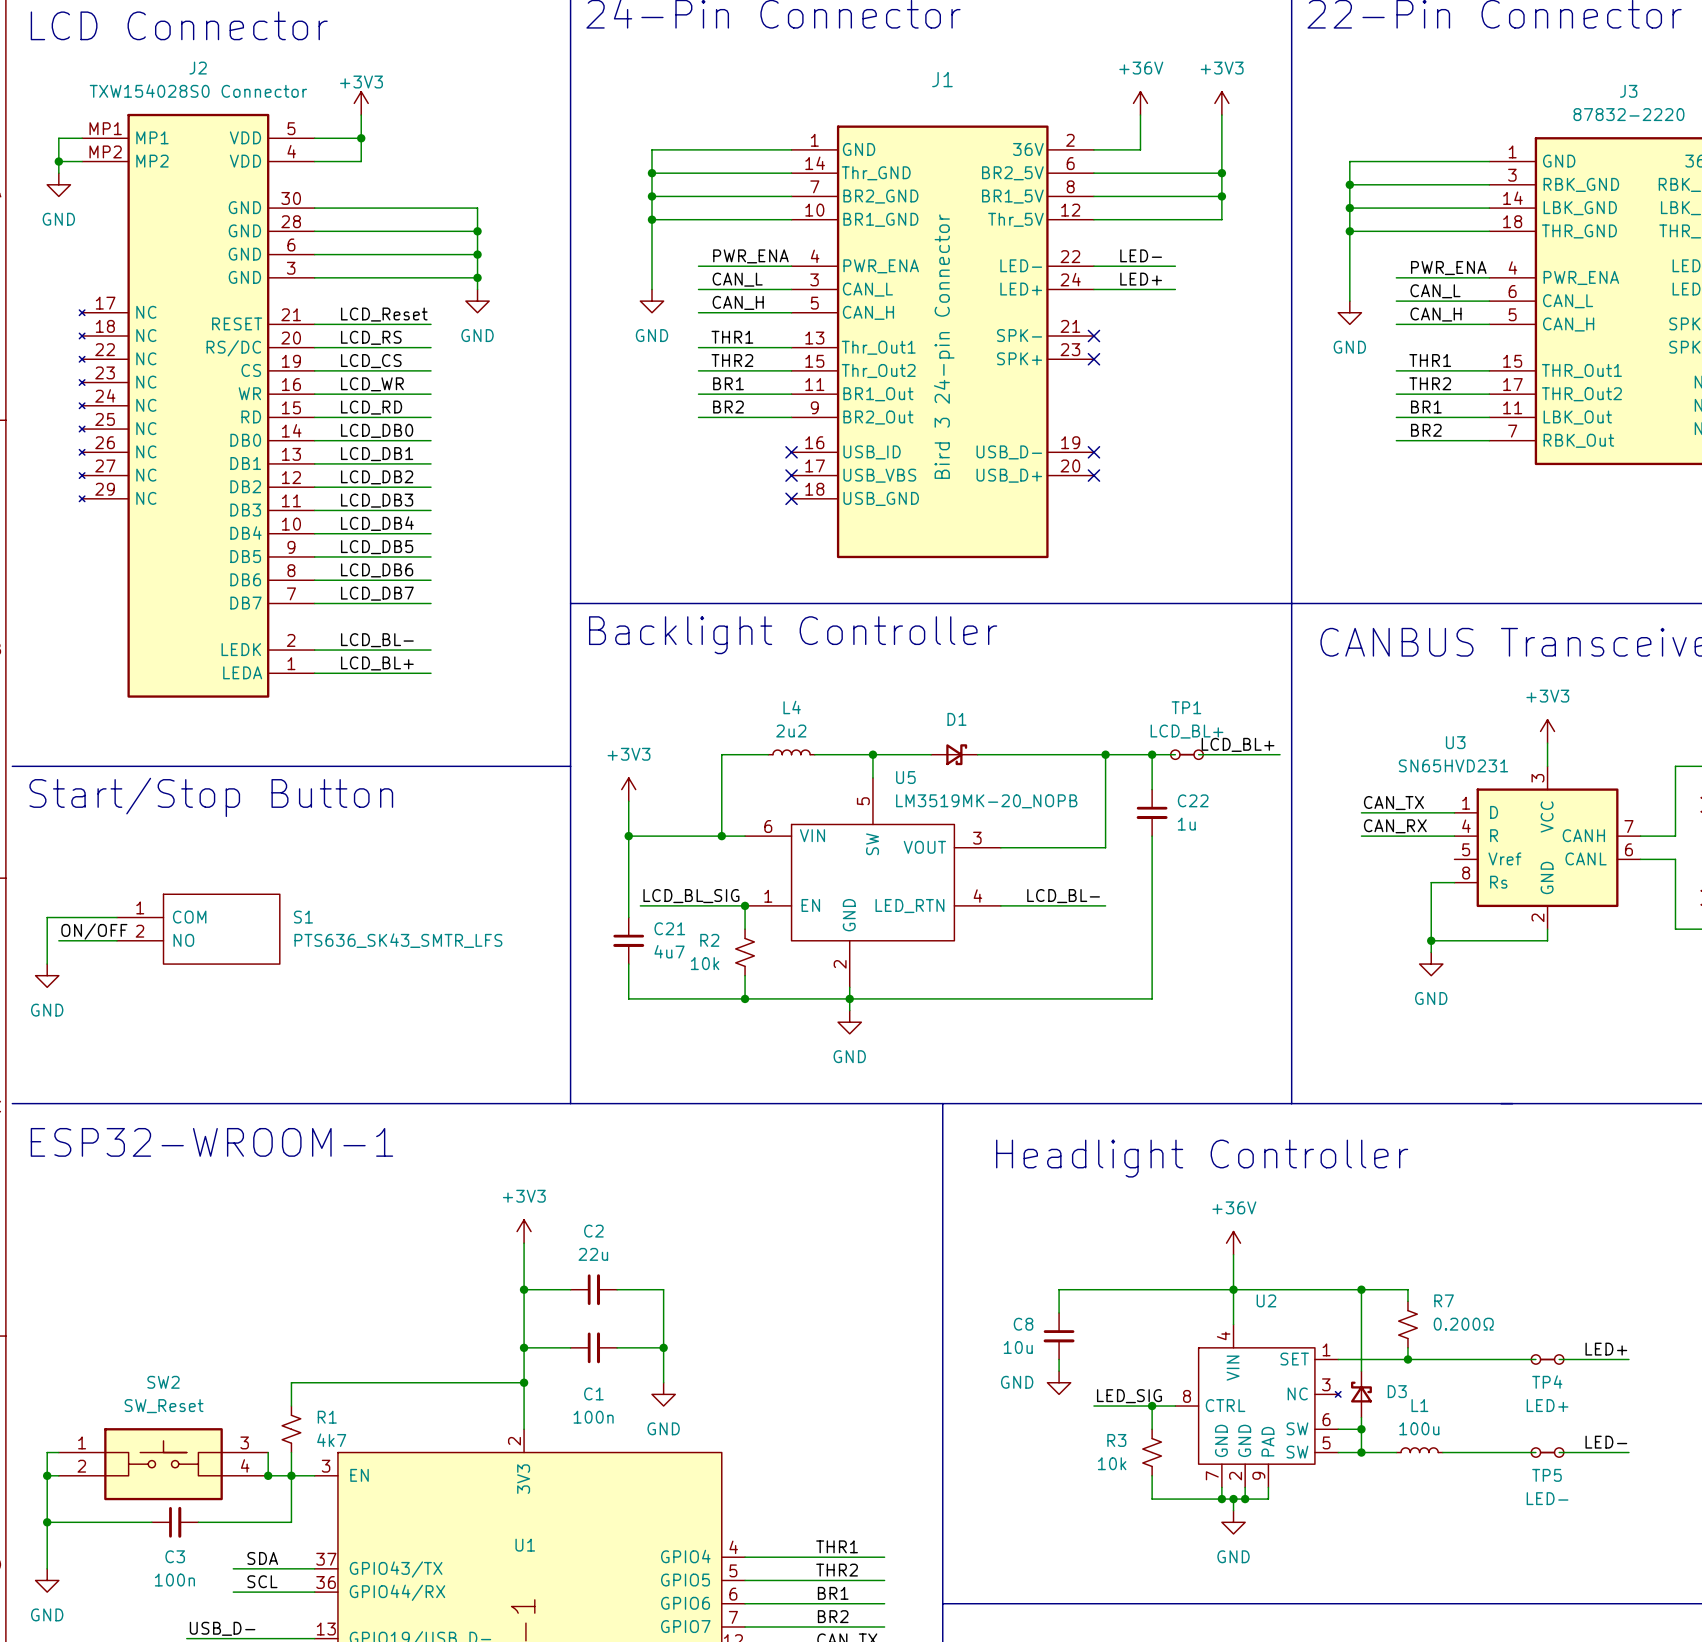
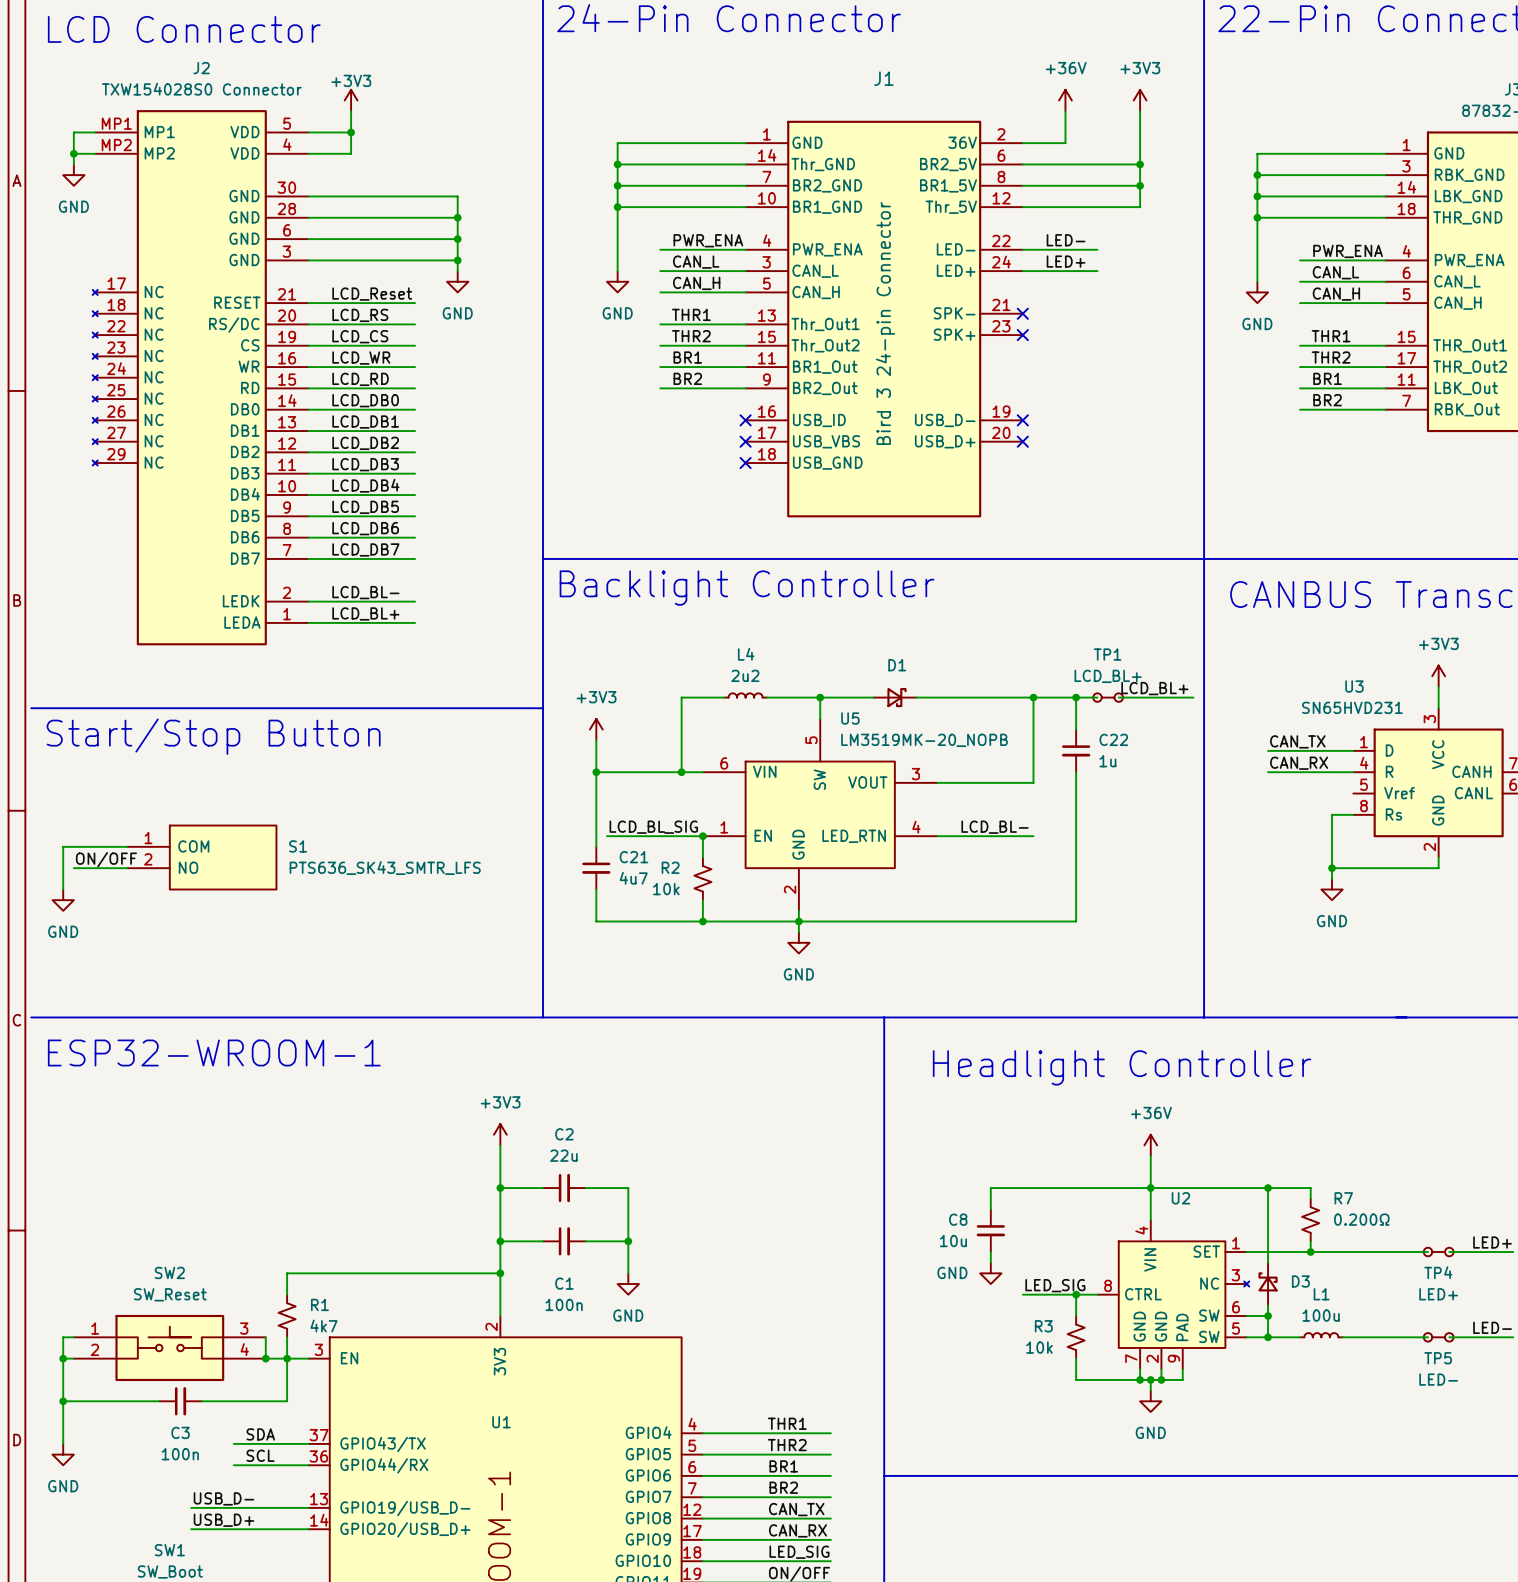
U5 symbol: [745, 777, 1001, 988] -> [702, 718, 938, 911]
S1 symbol: [116, 893, 281, 965] -> [127, 824, 278, 891]
U2 symbol: [1175, 1324, 1341, 1488] -> [1097, 1220, 1250, 1370]

